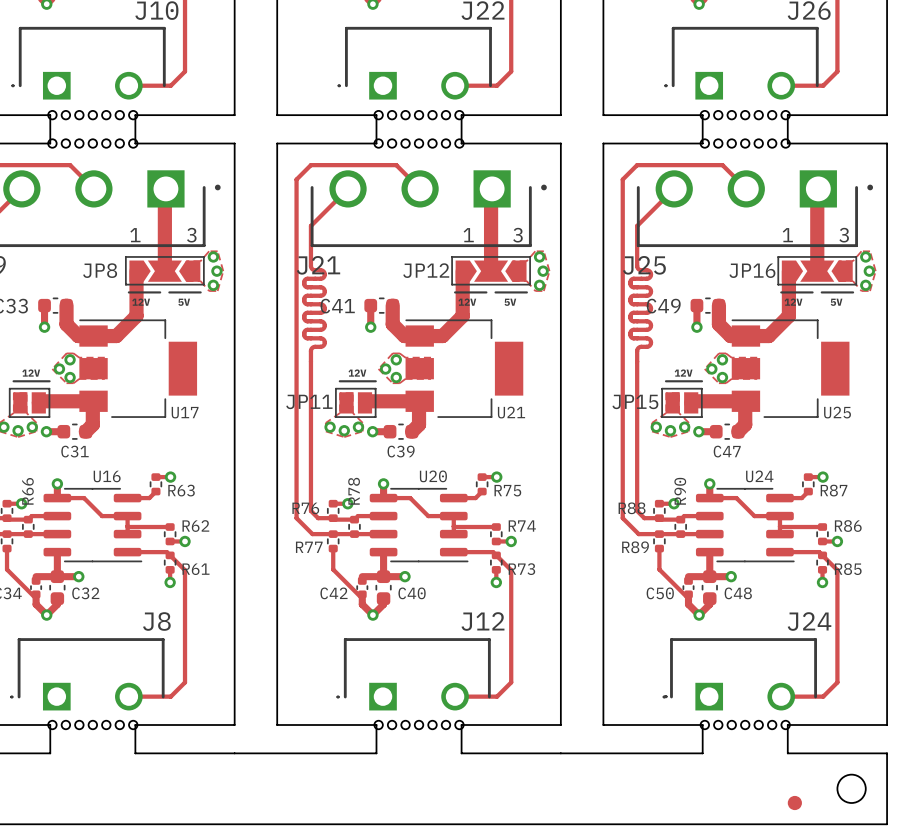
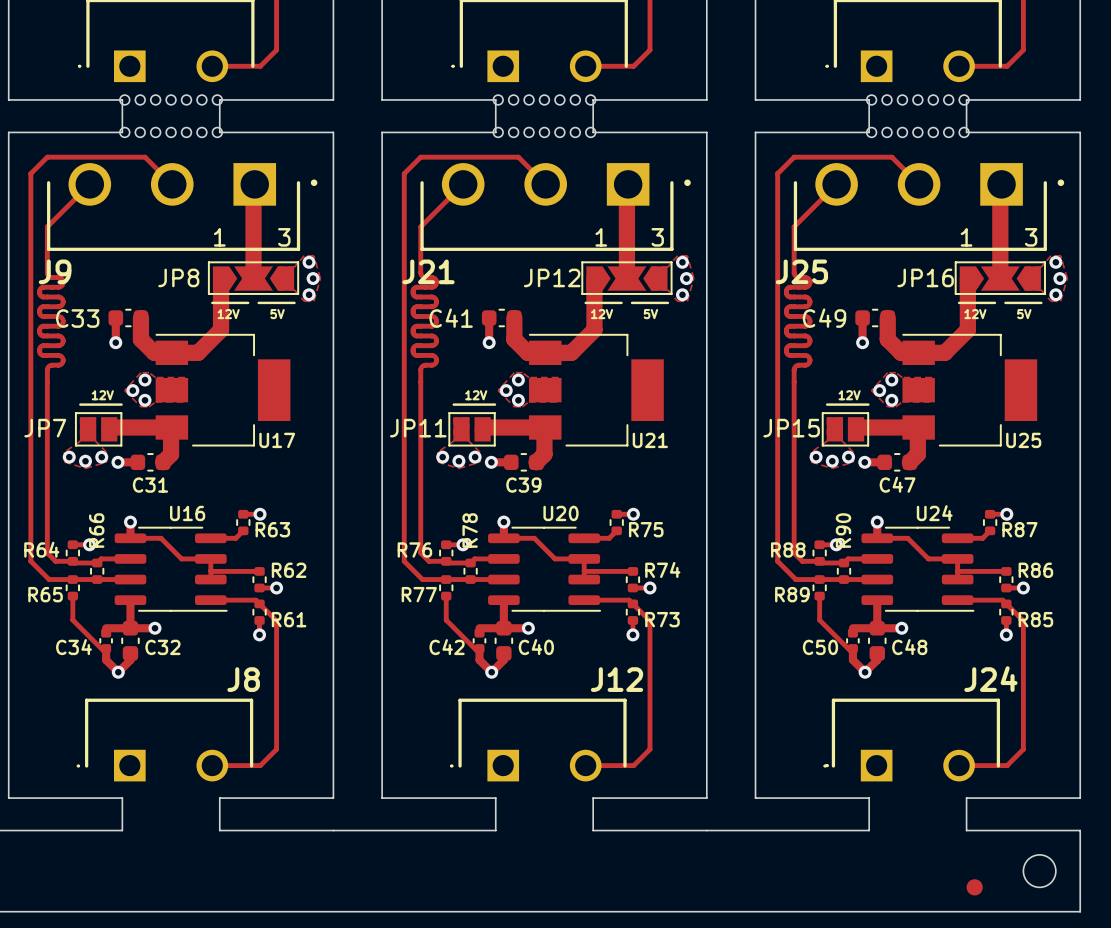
part: (92, 725) -> none
part: (419, 725) -> none
part: (745, 725) -> none

